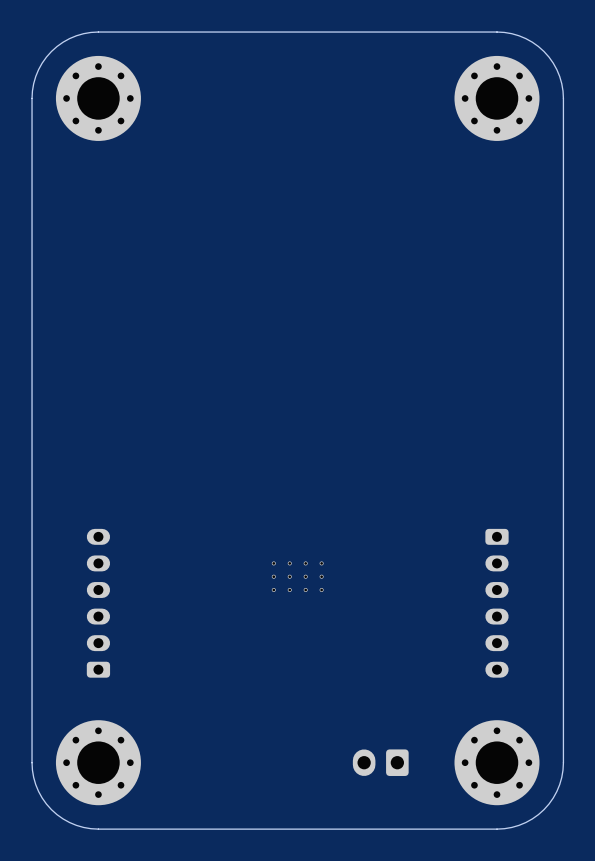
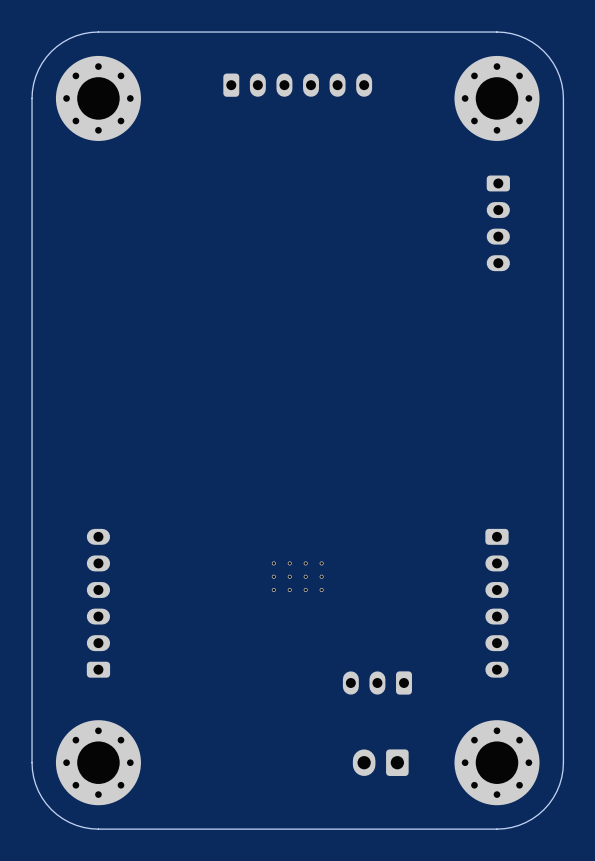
part: none -> (297, 85)
part: none -> (498, 223)
part: none -> (377, 682)

